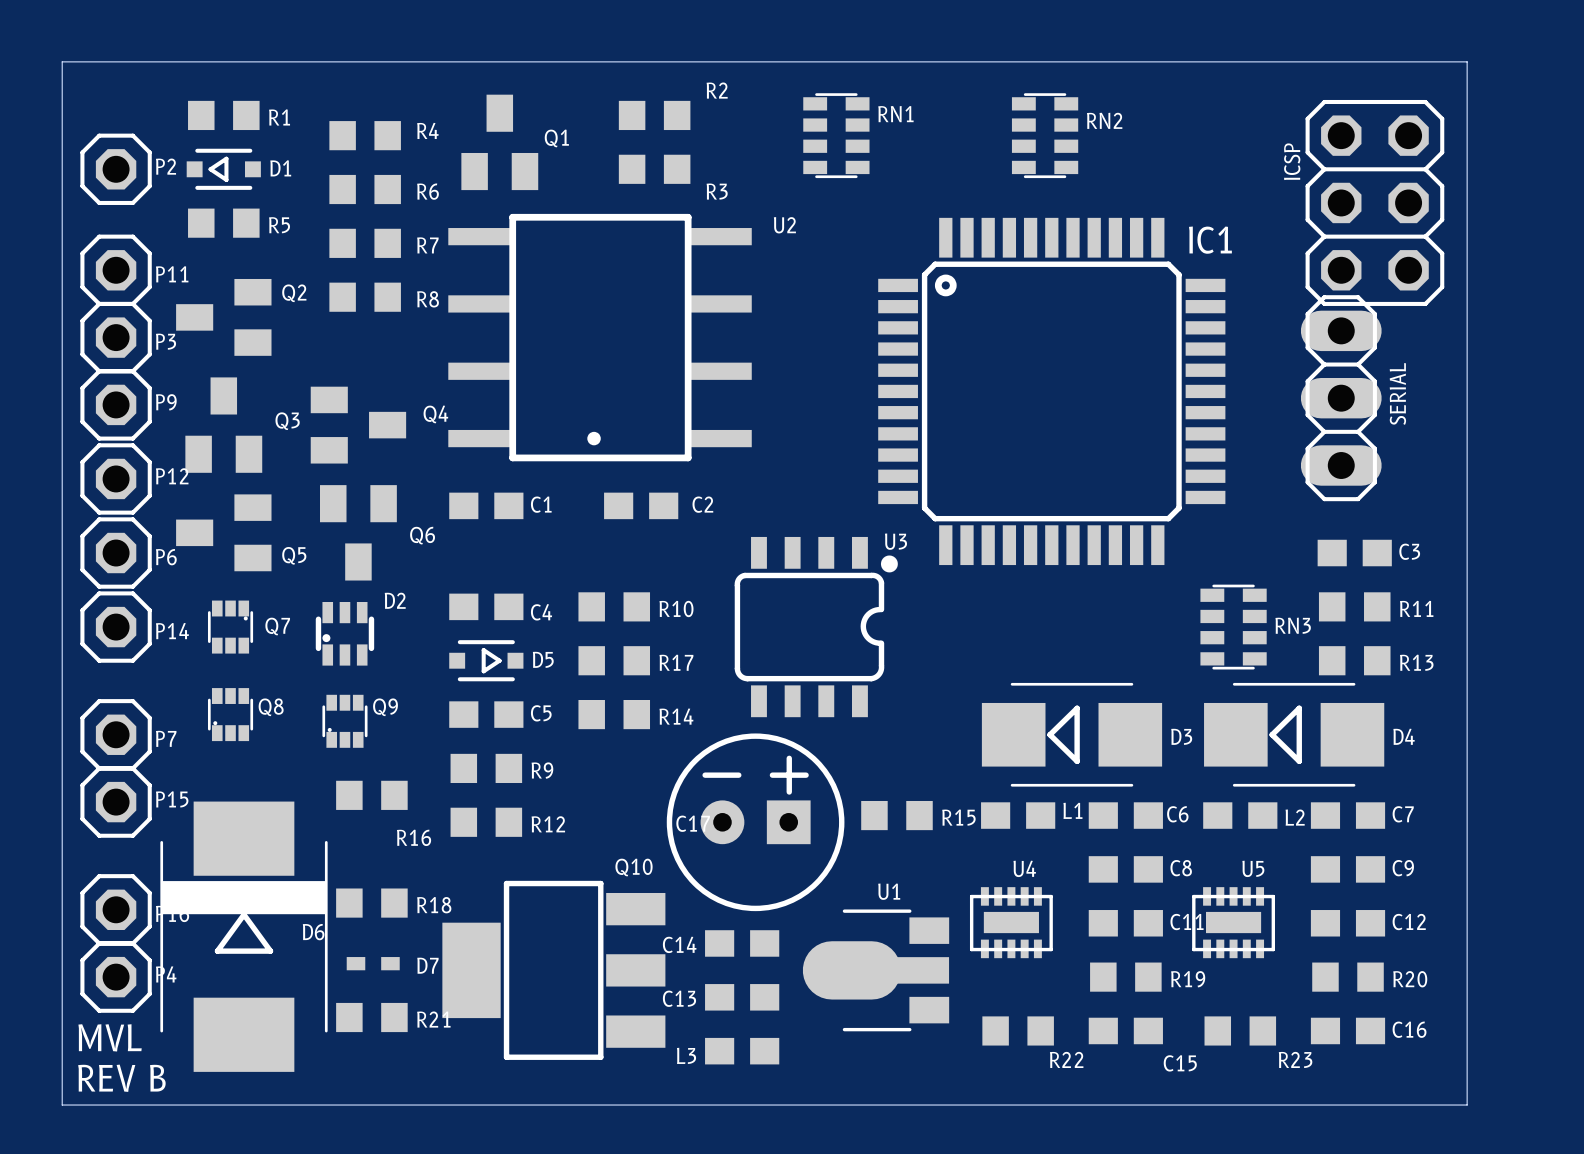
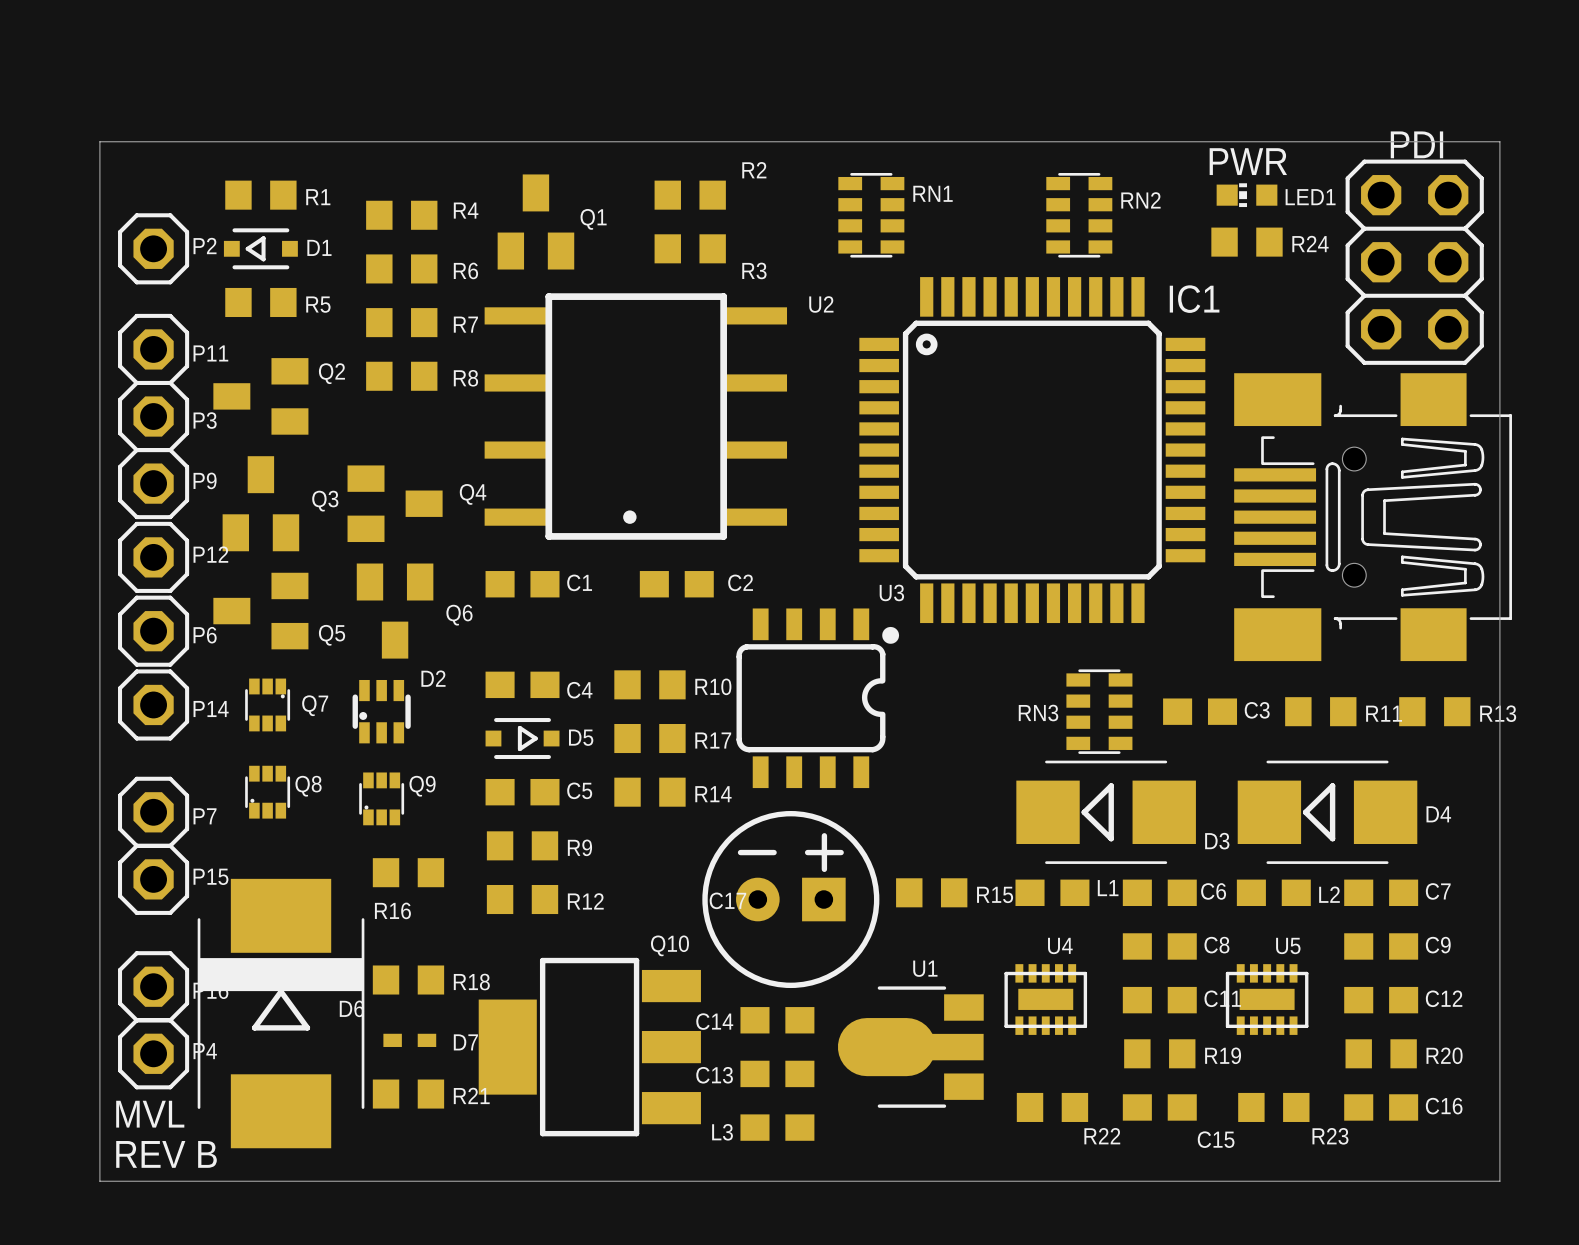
text: none -> PWR (1248, 161)
LED1: none -> (1247, 195)
ICSP name: ICSP (1292, 161) -> PDI (1416, 144)
R24: none -> (1247, 242)
ICSP position: (1374, 202) -> (1414, 262)
IC1 position: (1051, 391) -> (1032, 450)
SERIAL: (1341, 398) -> none
part: none -> (1373, 517)
U3 name position: U3 (895, 541) -> U3 (891, 592)
C3 position: (1354, 553) -> (1200, 711)
R11 position: (1354, 606) -> (1320, 711)
RN3 name position: RN3 (1293, 625) -> RN3 (1038, 713)
U3 position: (816, 627) -> (817, 698)
RN3 position: (1233, 627) -> (1099, 711)
R13 position: (1354, 660) -> (1434, 711)
D3 name position: D3 (1181, 736) -> D3 (1217, 841)
R16 name position: R16 (414, 837) -> R16 (392, 910)

